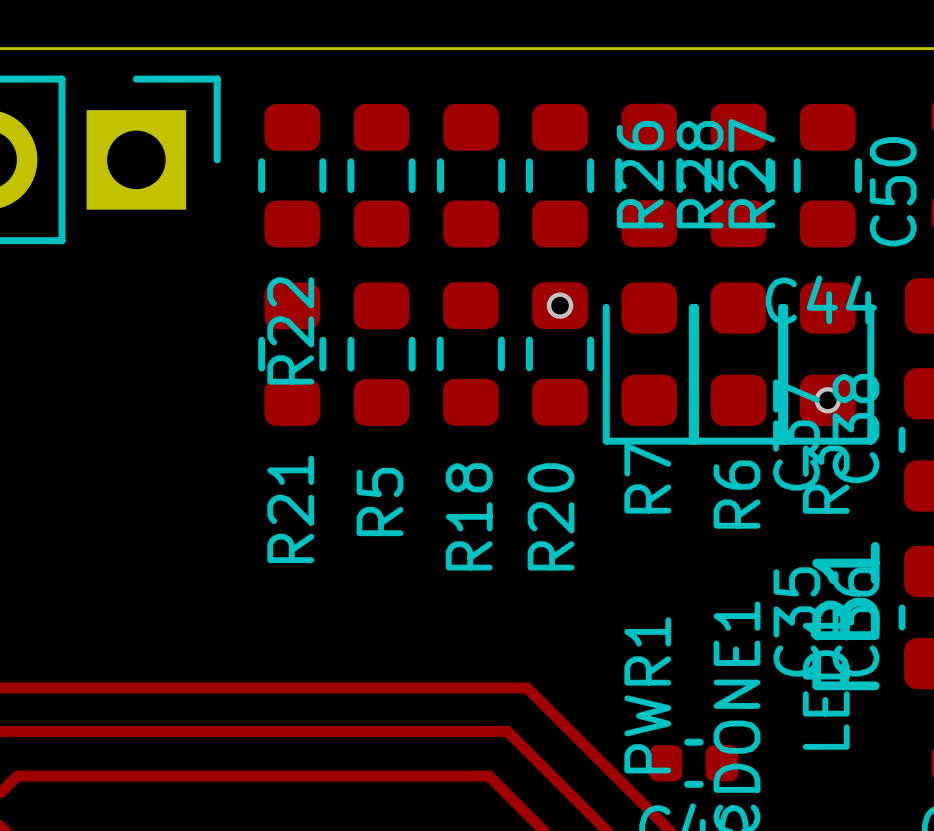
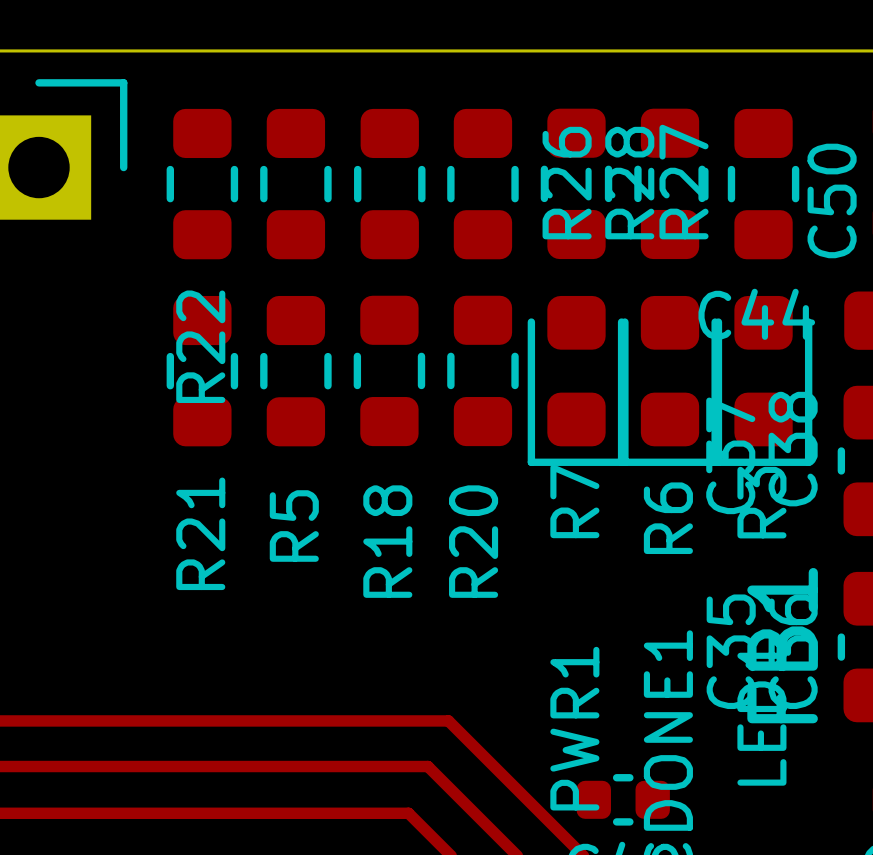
via: (560, 305) -> none
via: (827, 400) -> none

